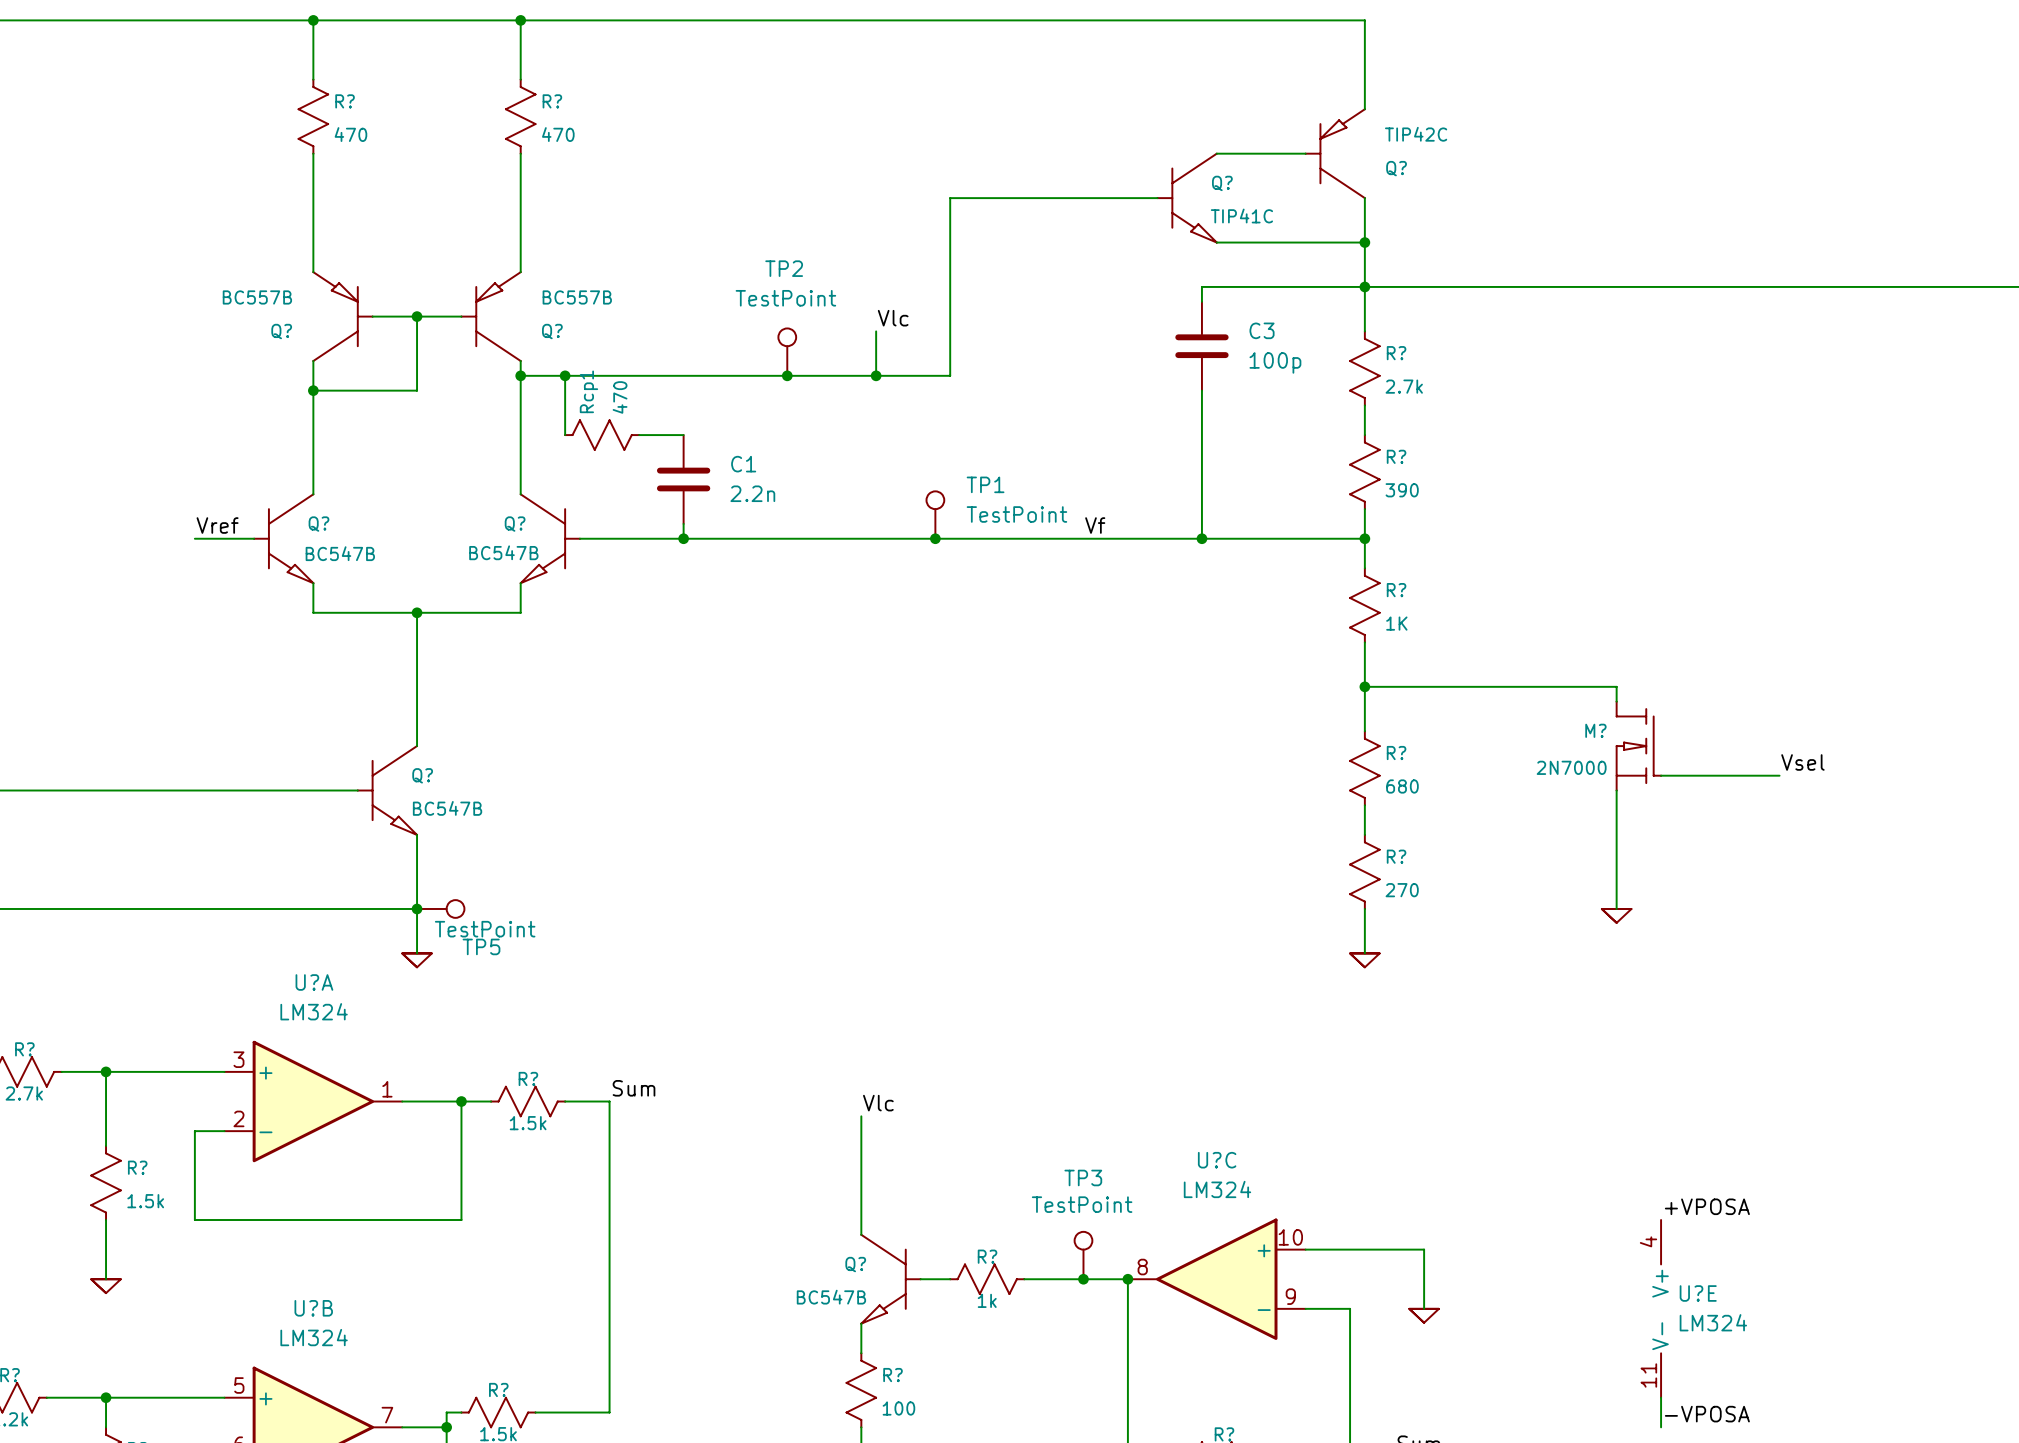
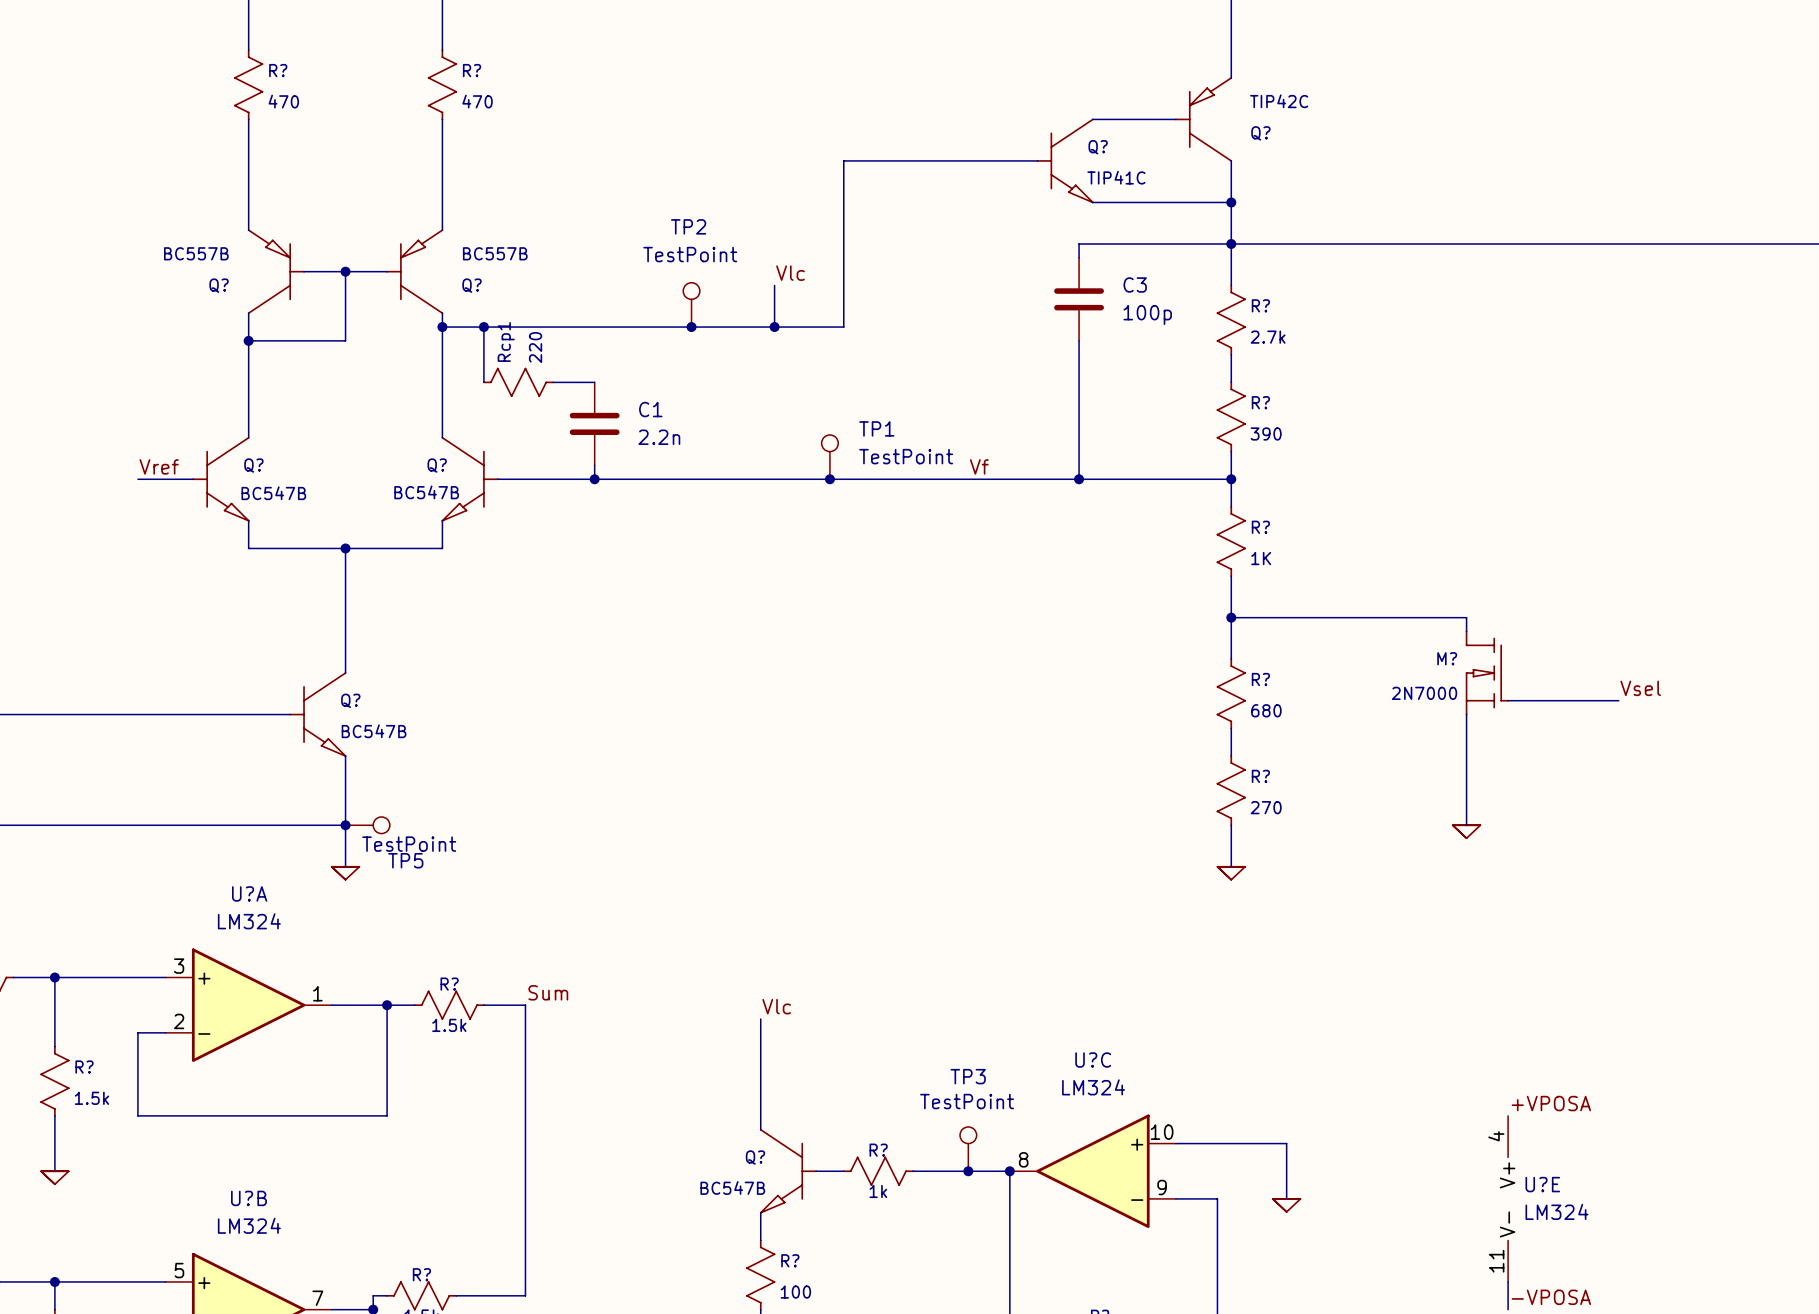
Rcp1 value: 470 (620, 397) -> 220 (535, 347)

